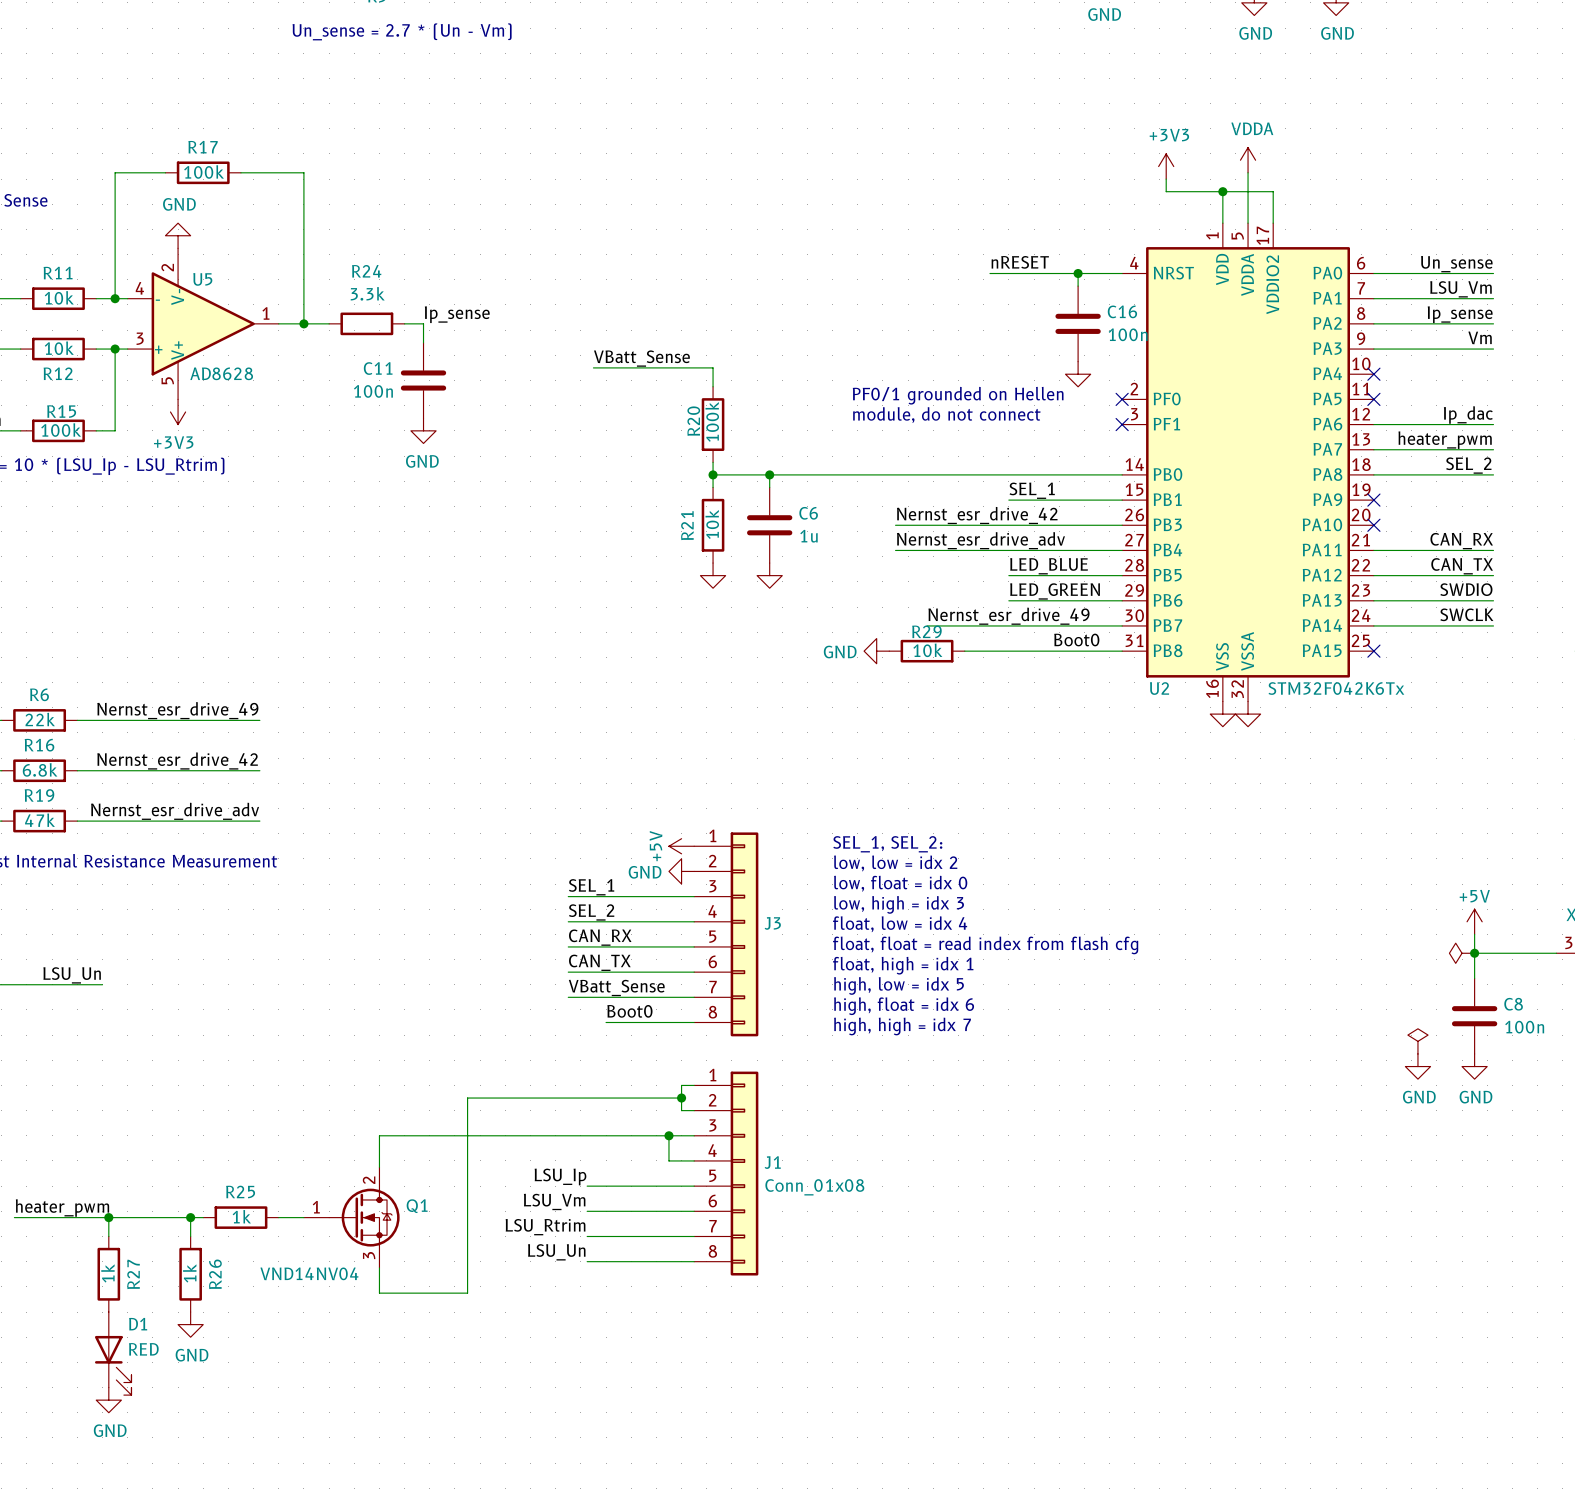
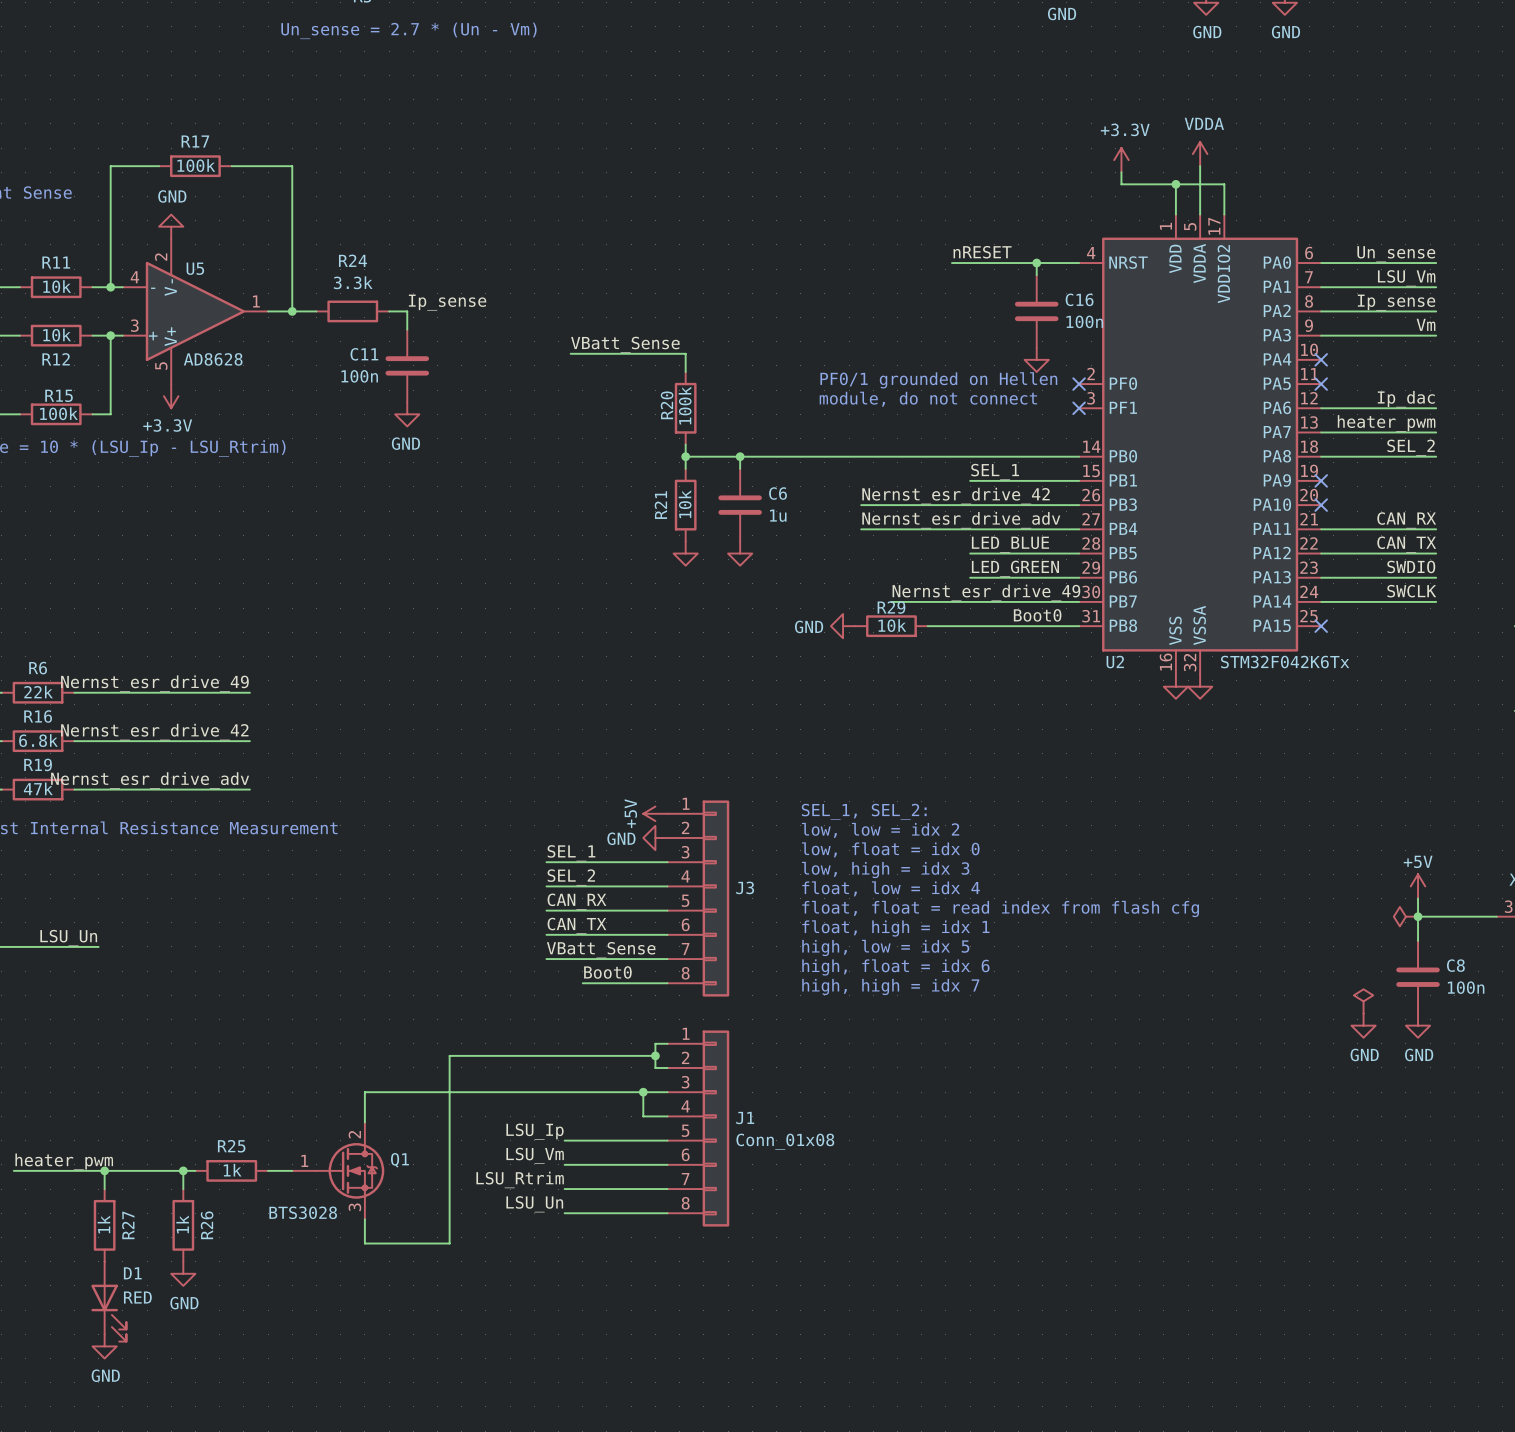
power symbol: +3V3 (1166, 166) -> +3.3V (1121, 160)
power symbol: +3V3 (178, 411) -> +3.3V (171, 396)
Q1 value: VND14NV04 (309, 1273) -> BTS3028 (303, 1212)

